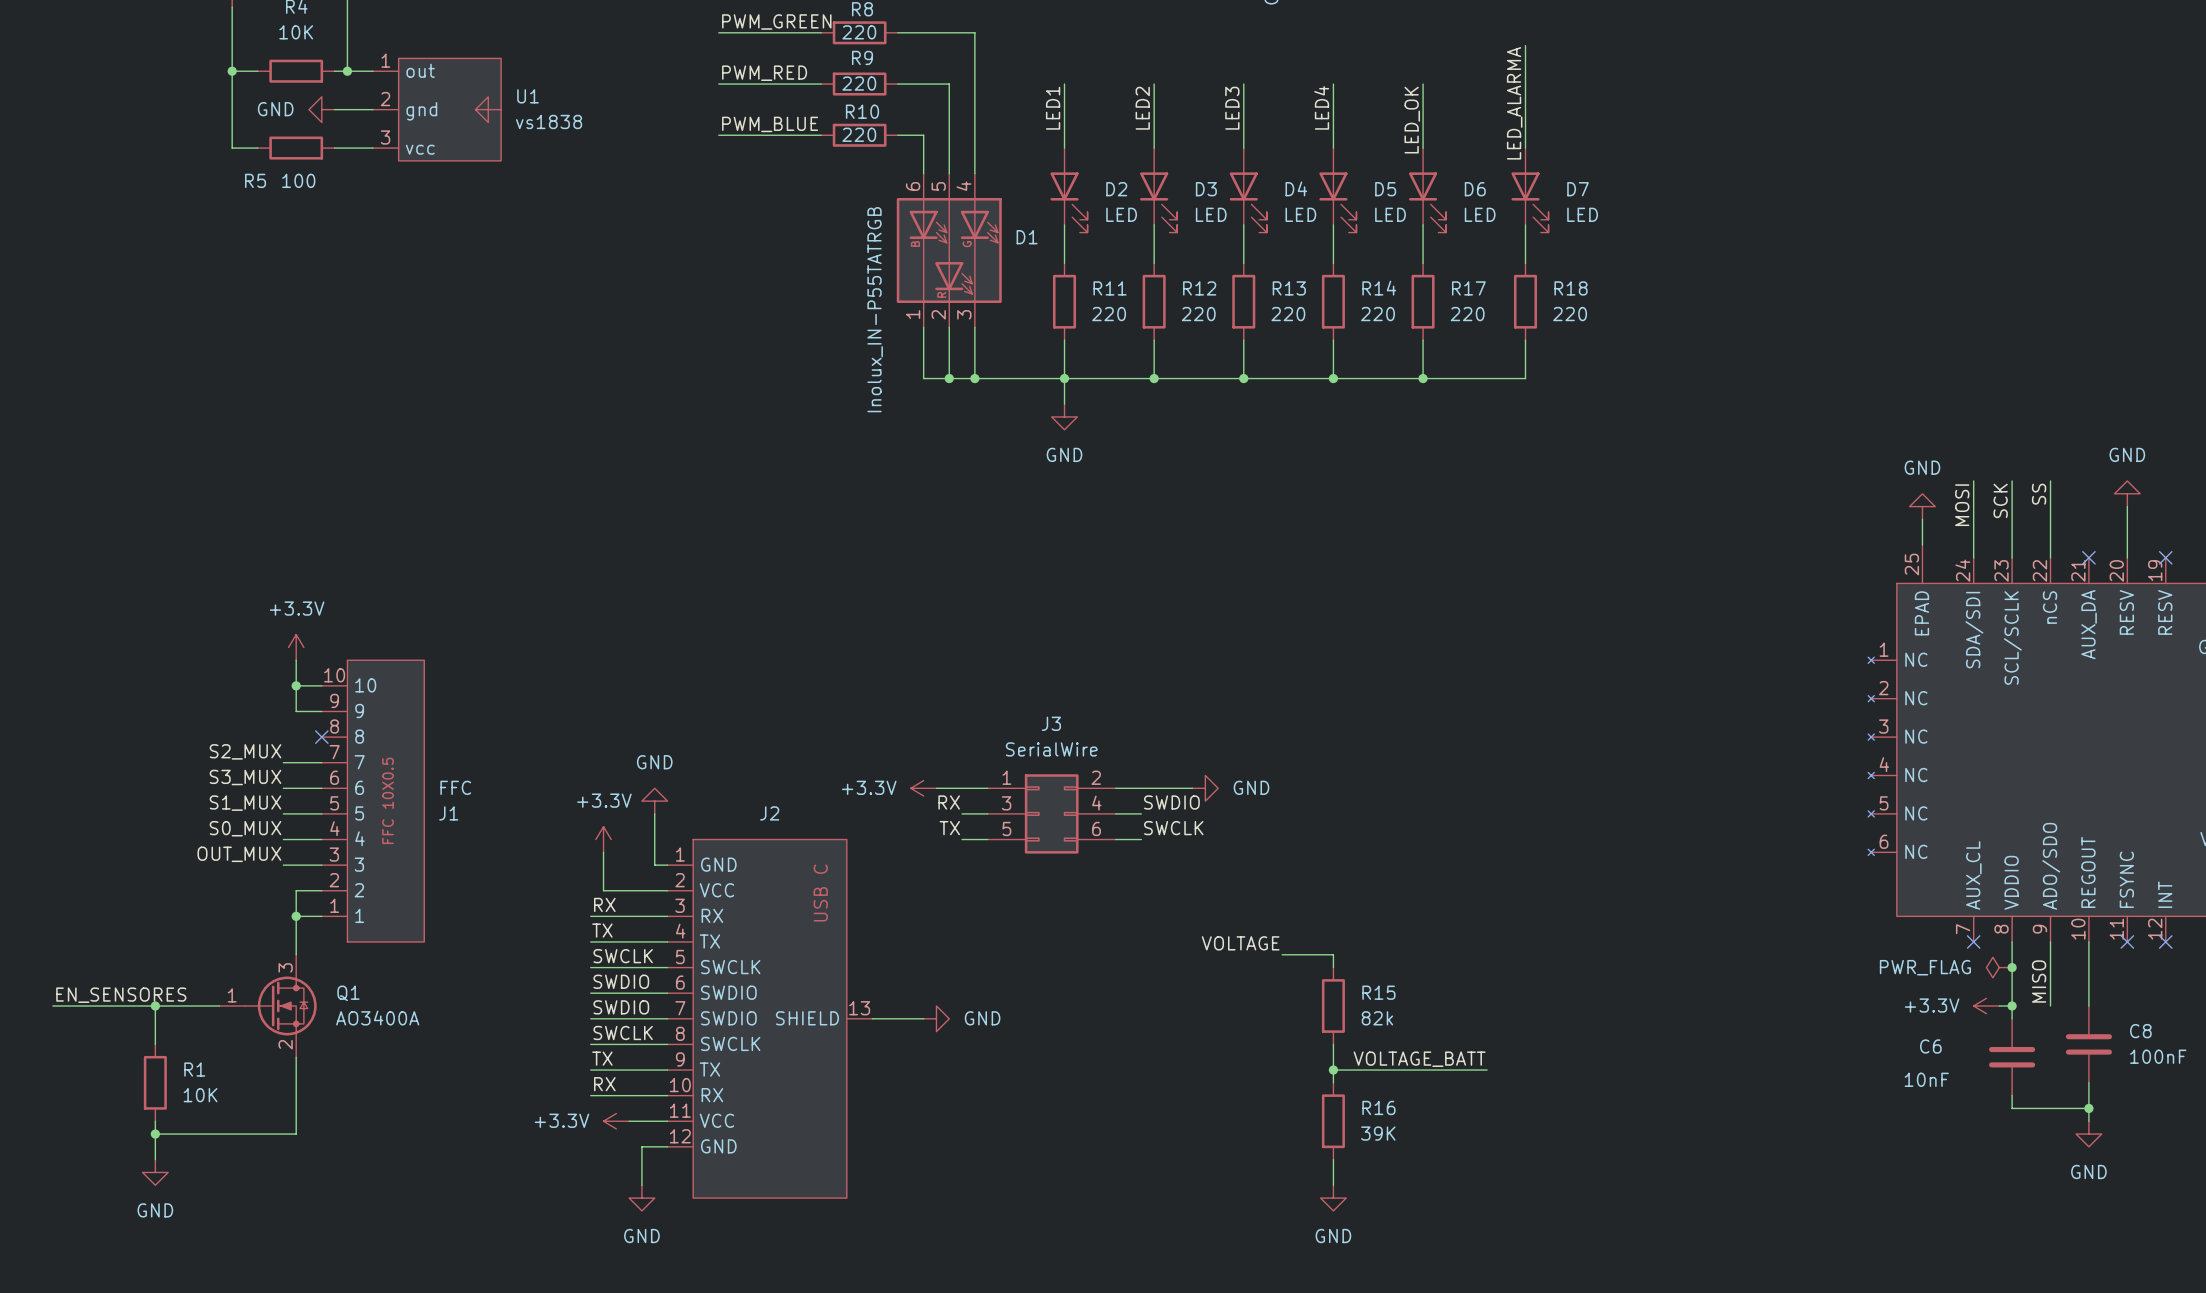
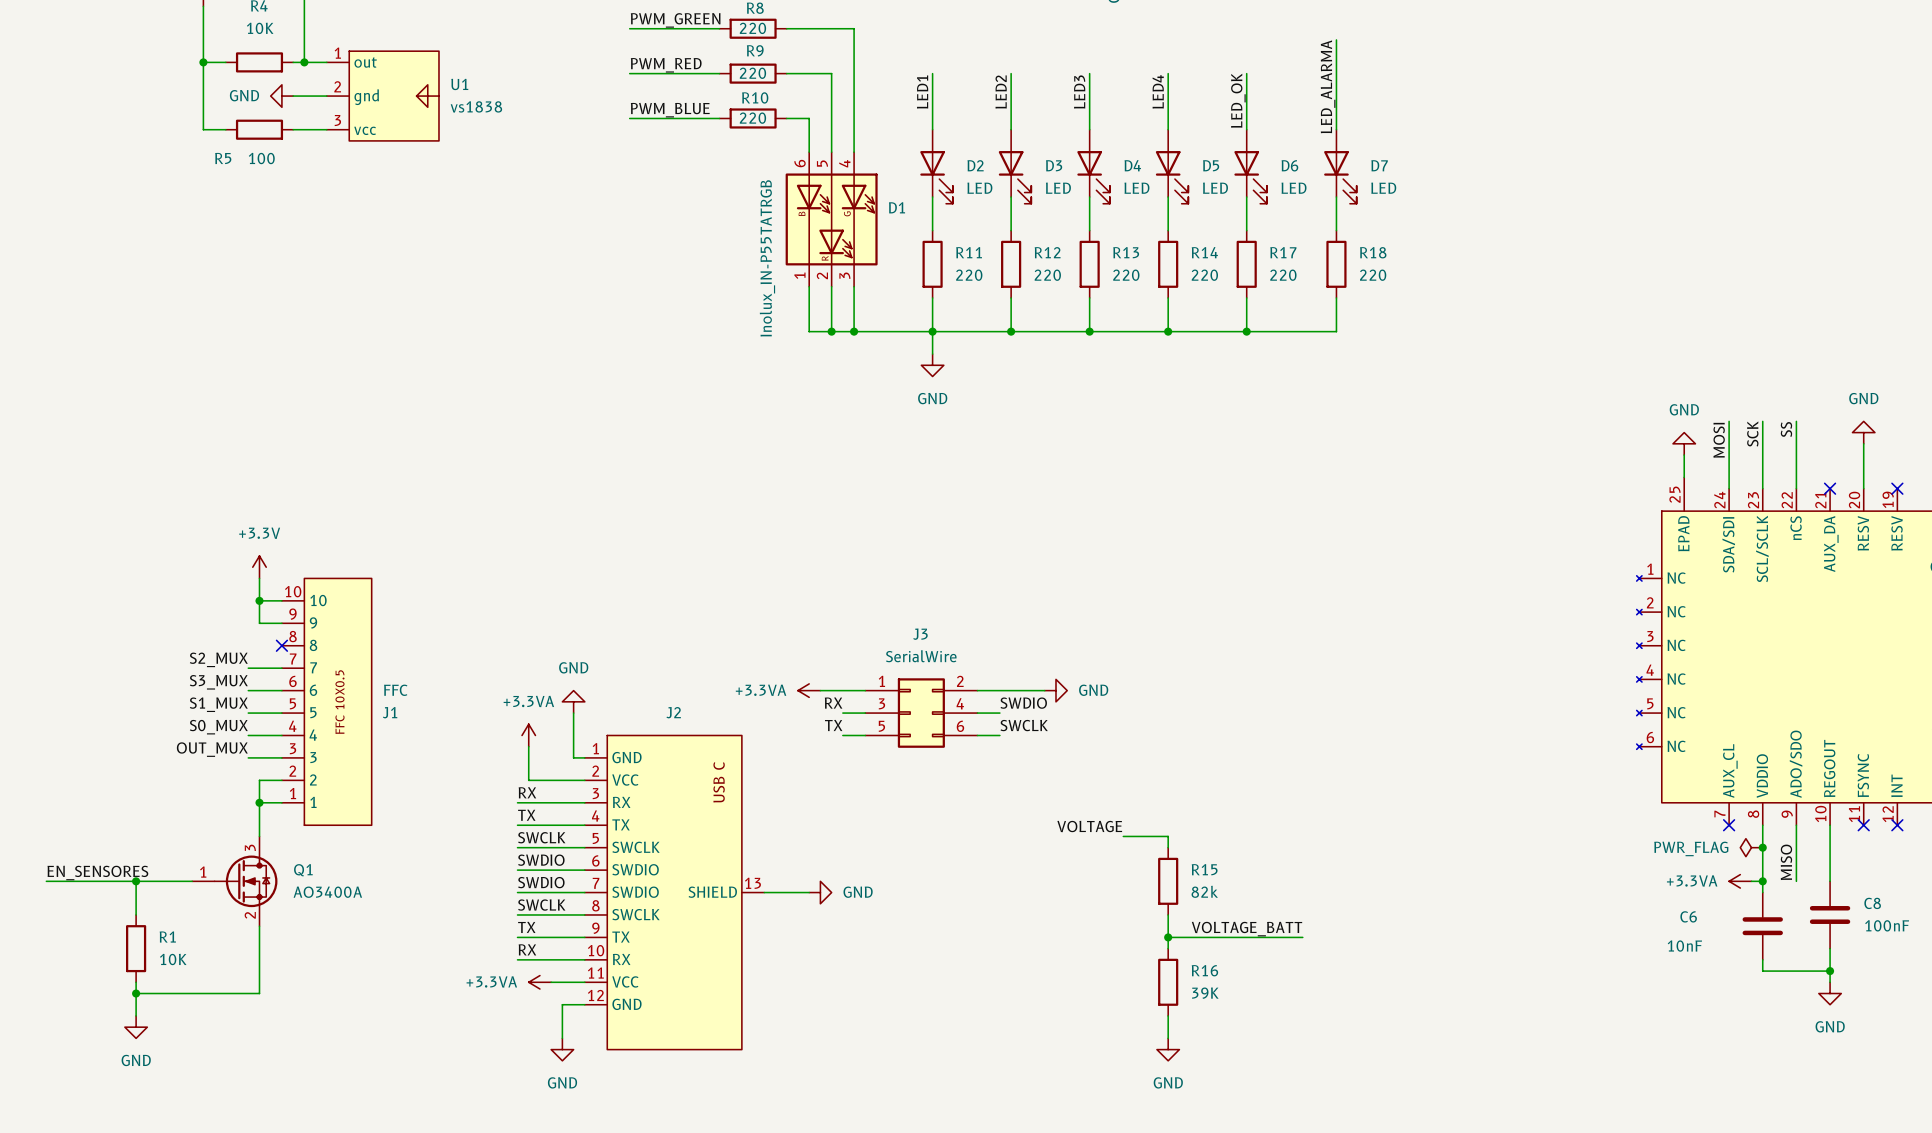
power symbol: +3.3V (923, 788) -> +3.3VA (809, 690)
power symbol: +3.3V (603, 839) -> +3.3VA (528, 735)
power symbol: +3.3V (1986, 1006) -> +3.3VA (1740, 881)
power symbol: +3.3V (616, 1121) -> +3.3VA (539, 982)

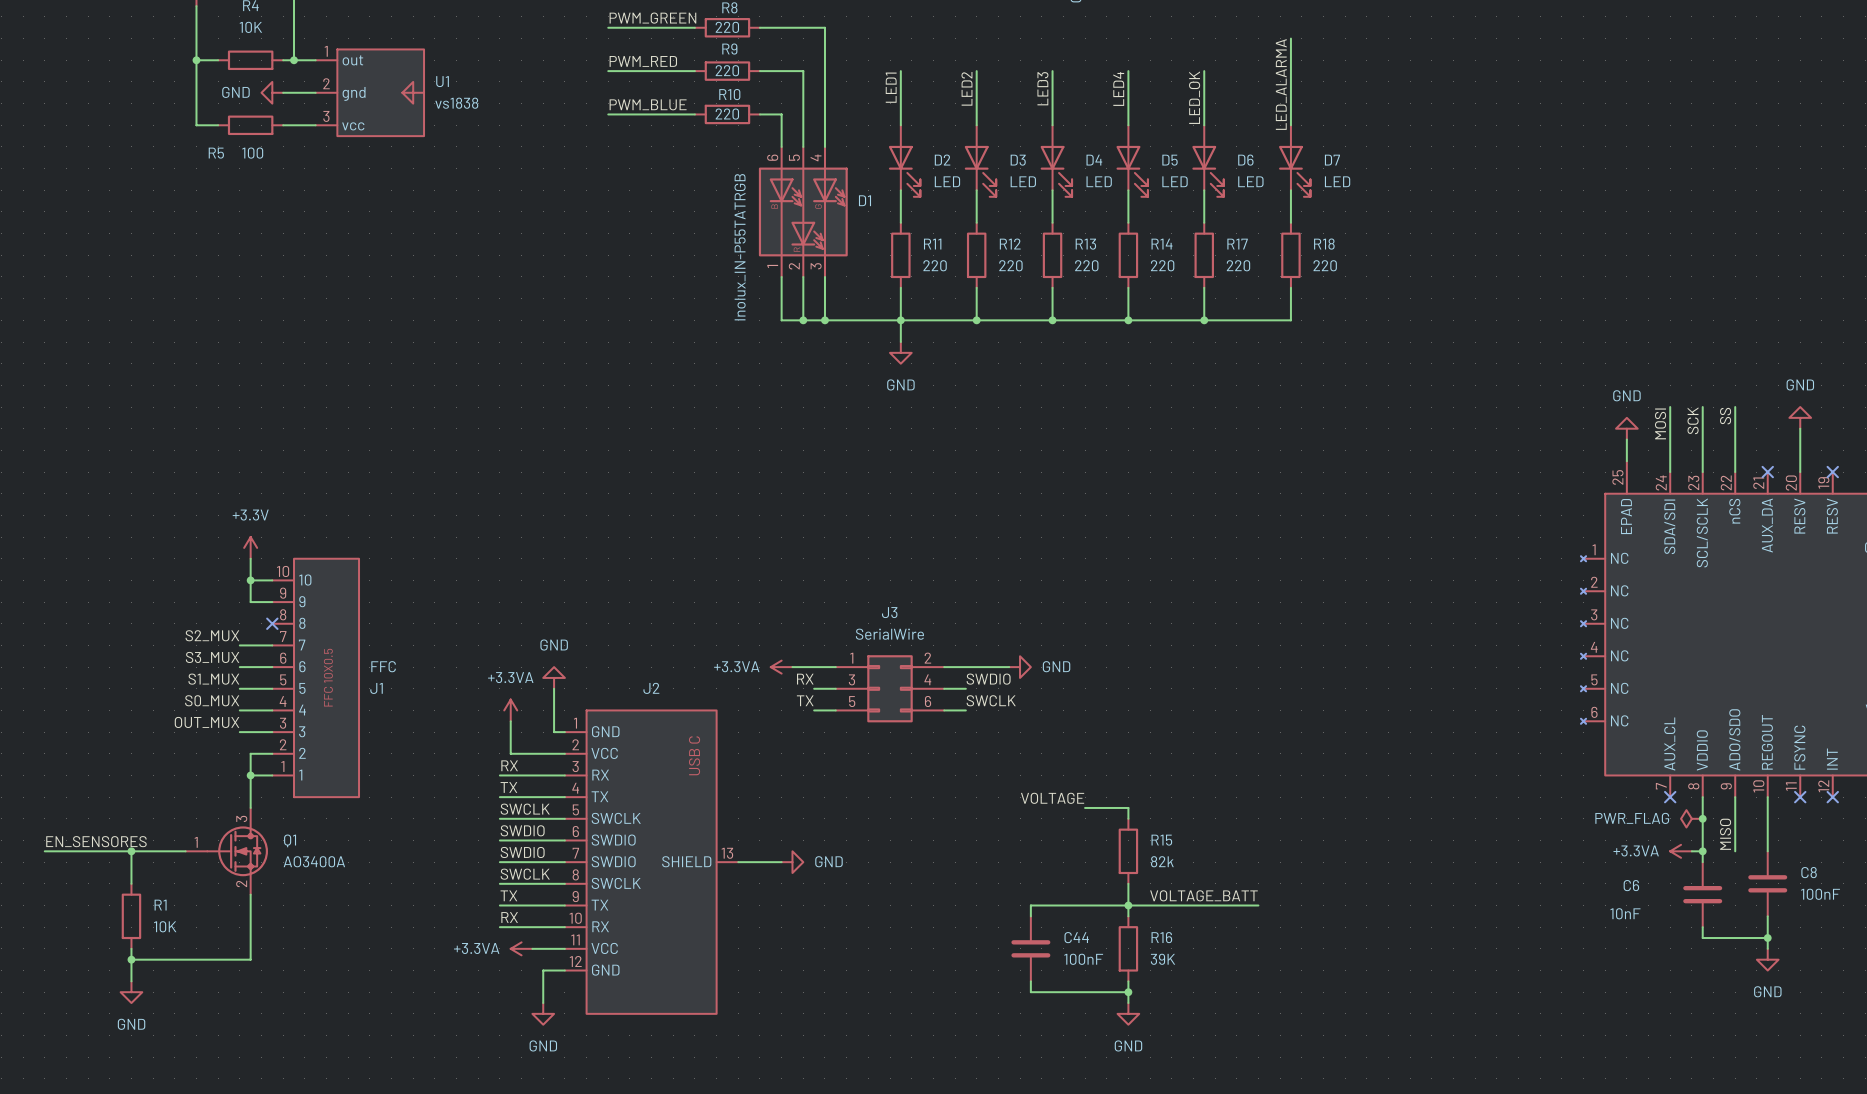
wire: none -> (1128, 905) (1030, 905) (1030, 916)
C44: none -> 100nF (1030, 948)
wire: none -> (1030, 981) (1030, 992) (1128, 992)
junction: none -> (1128, 992)

